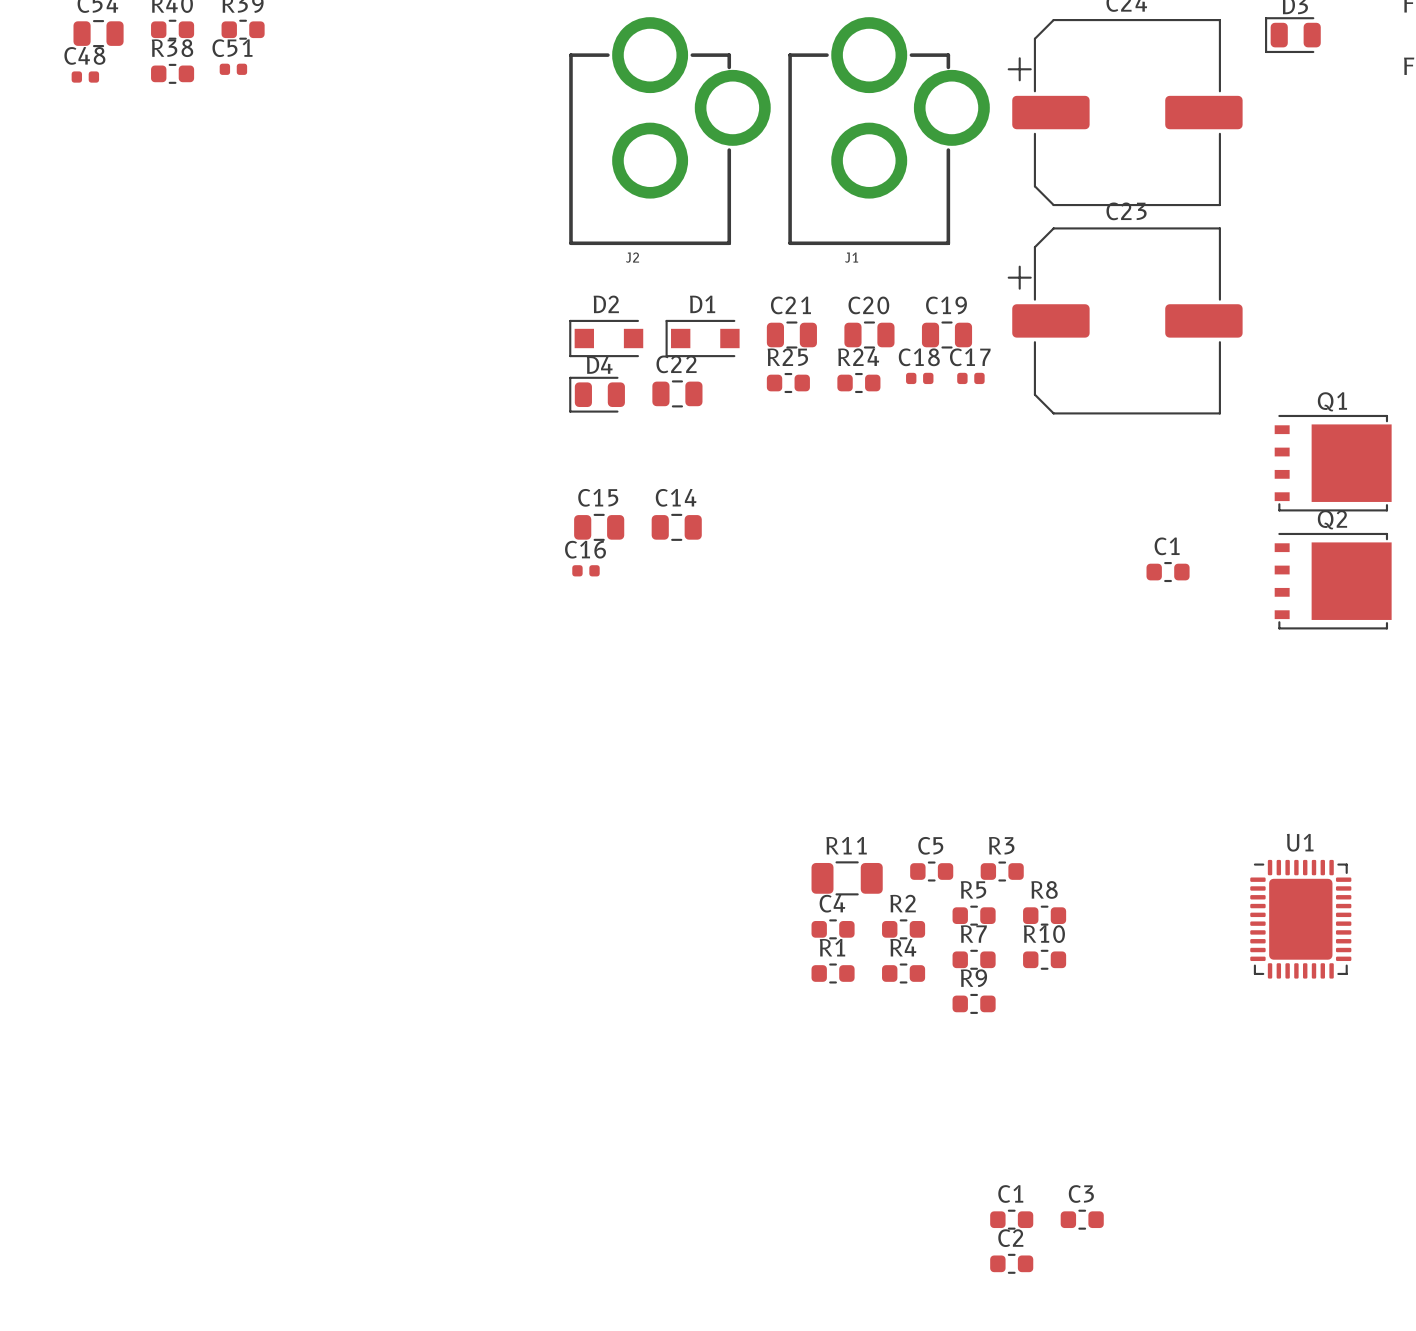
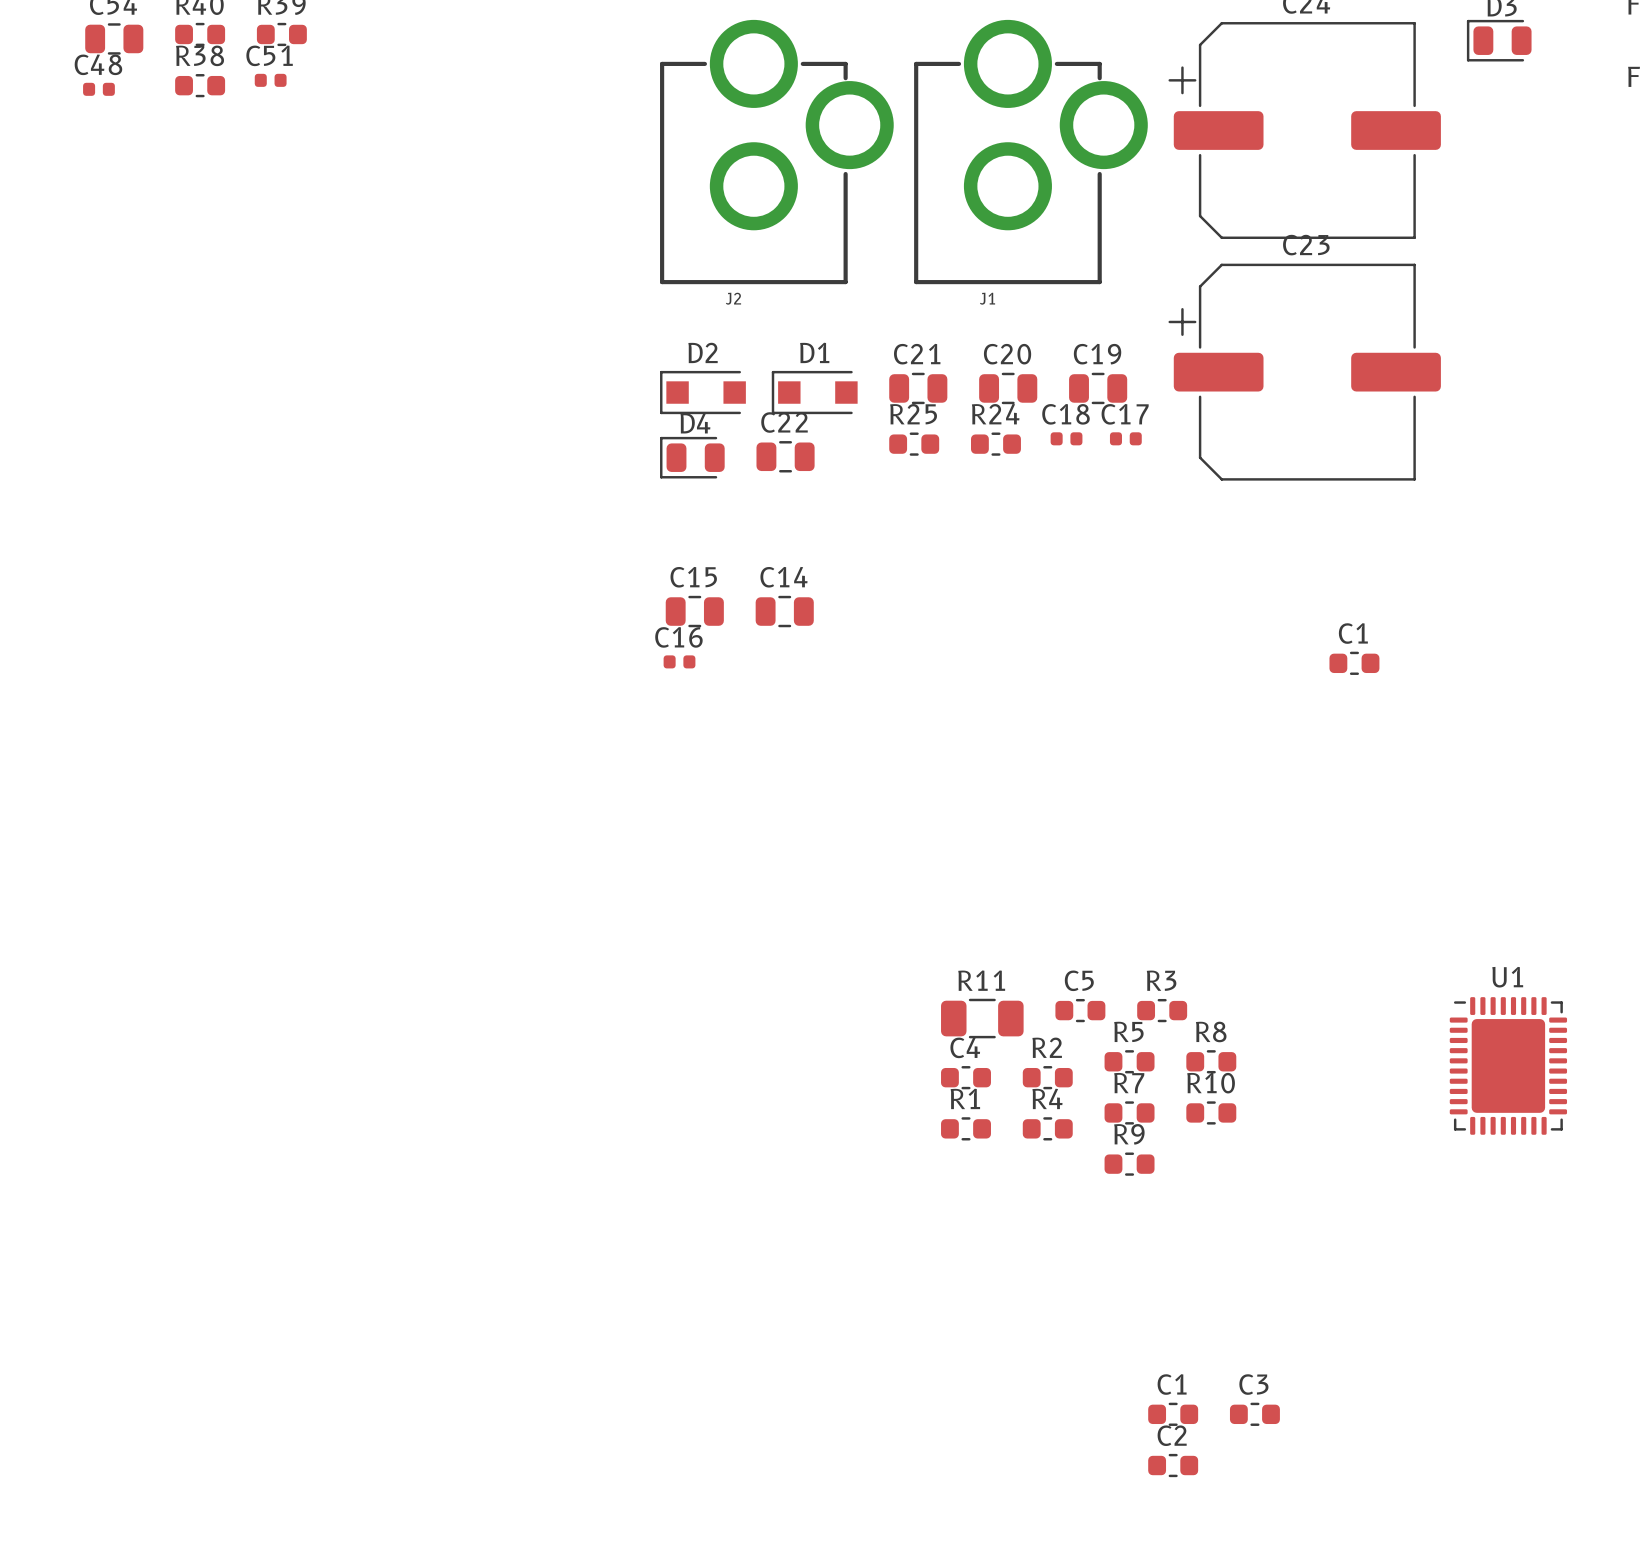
Q1: (1333, 463) -> none
Q2: (1333, 581) -> none

